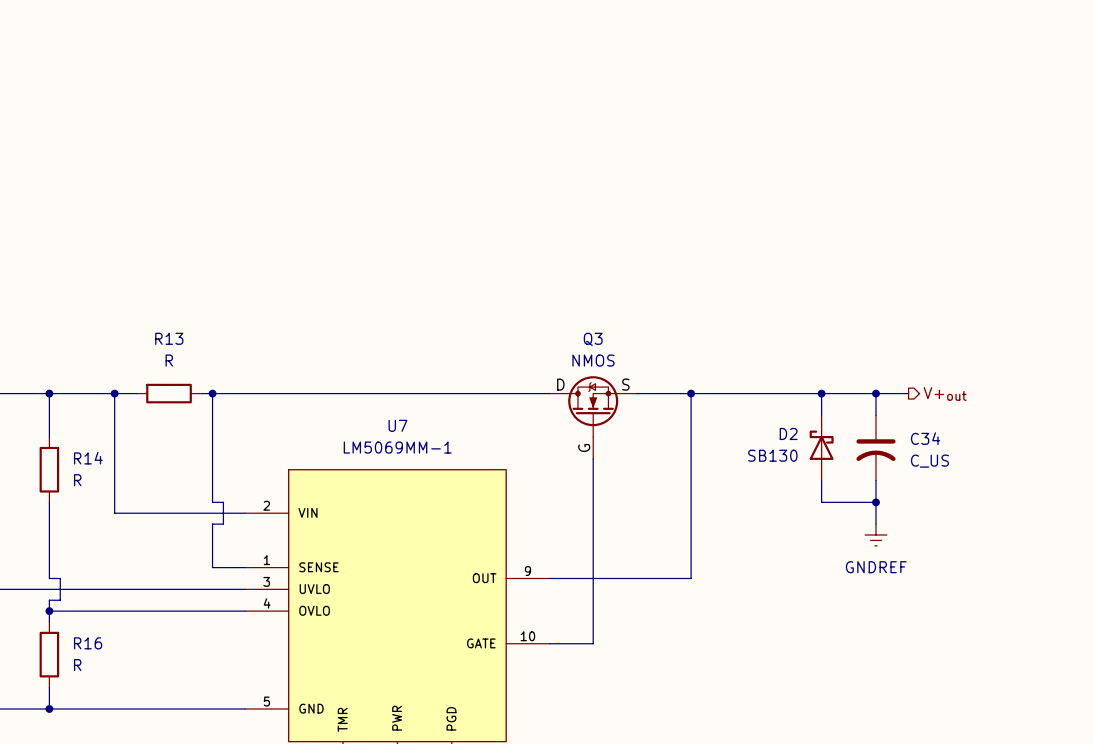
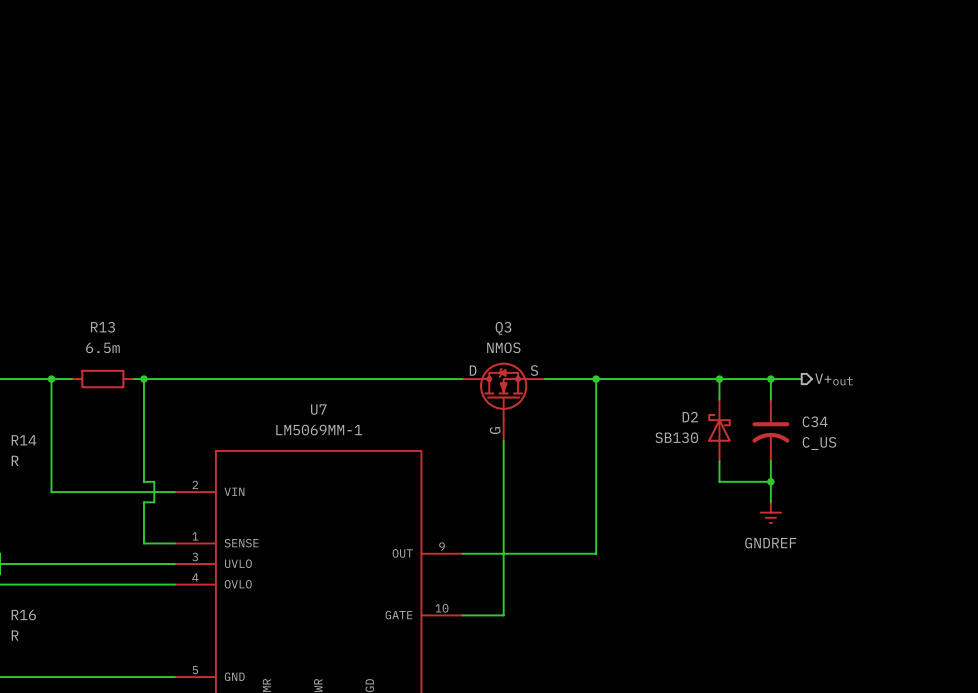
R13 value: R (169, 360) -> 6.5m (102, 347)

